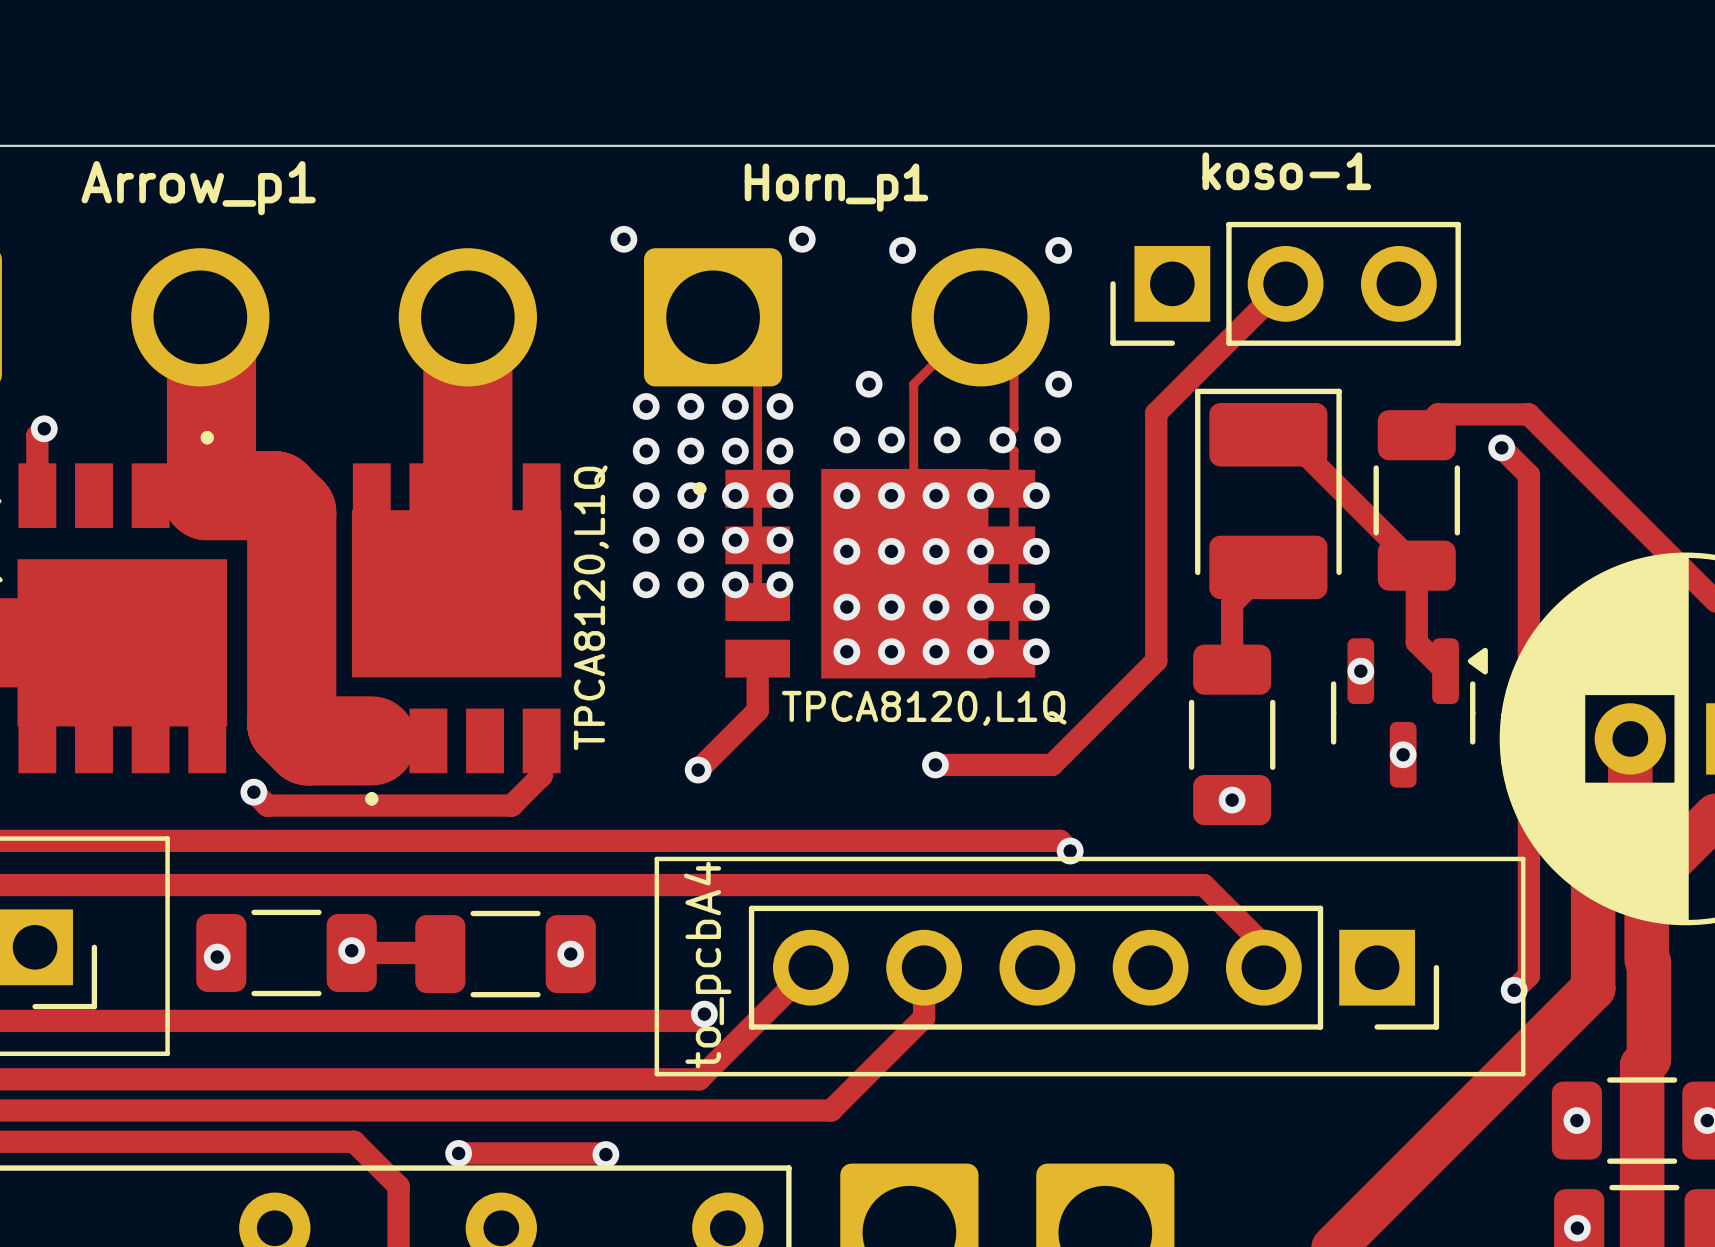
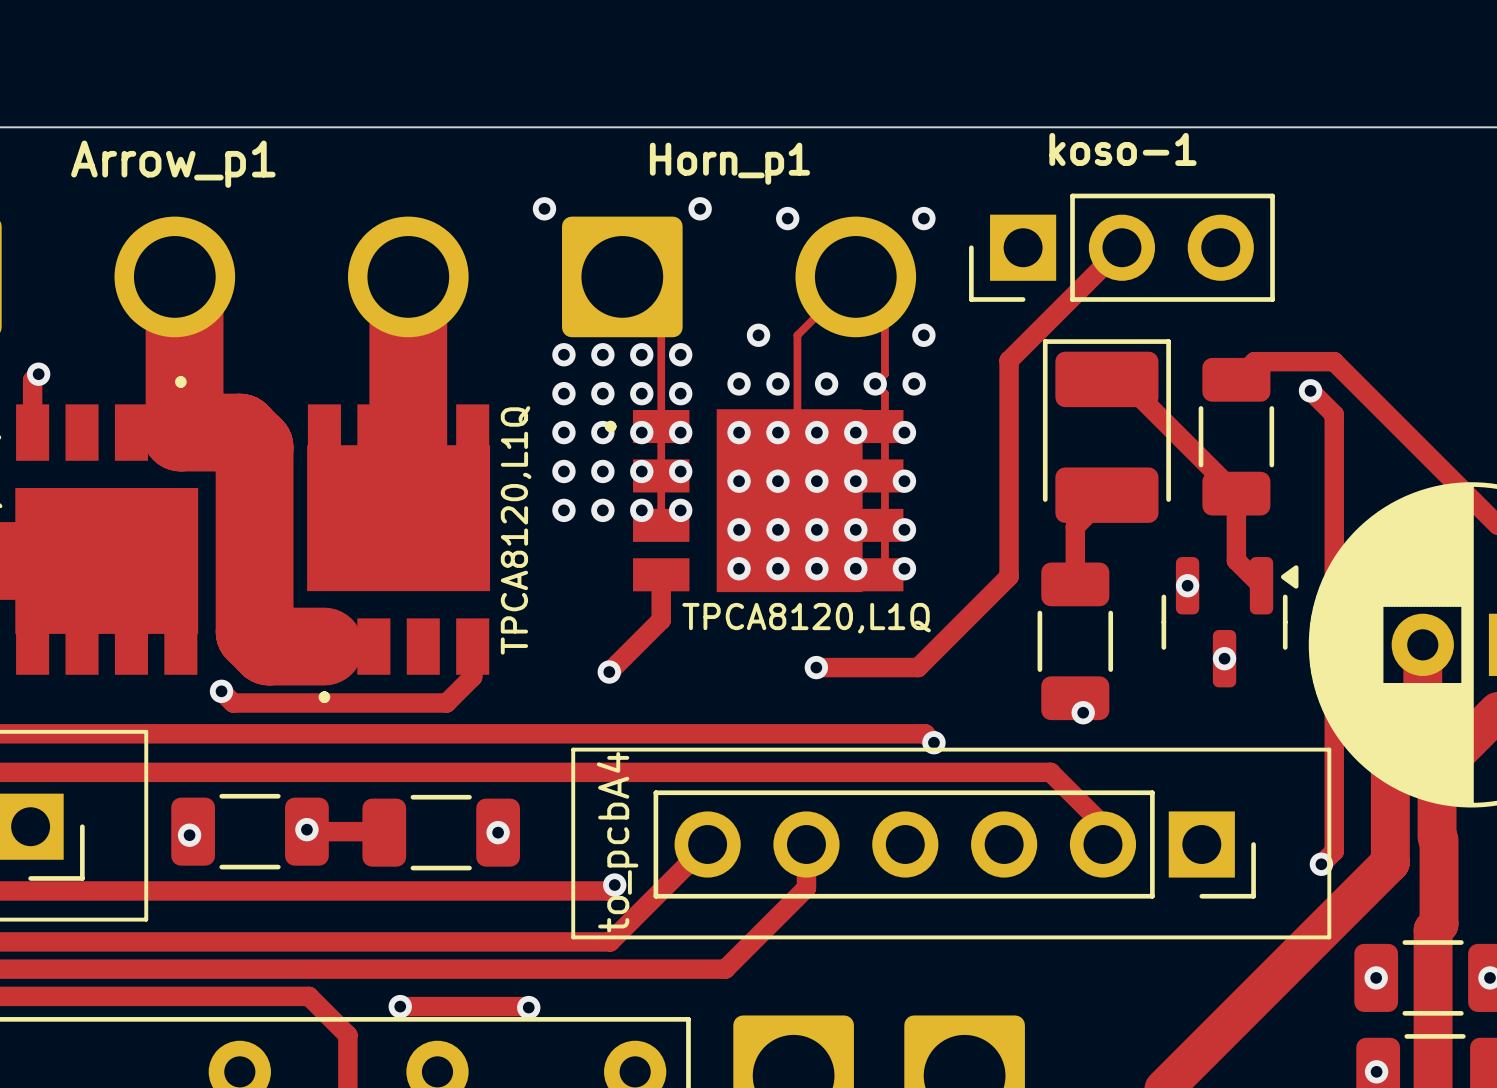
via position: (1232, 800) -> (1083, 712)

